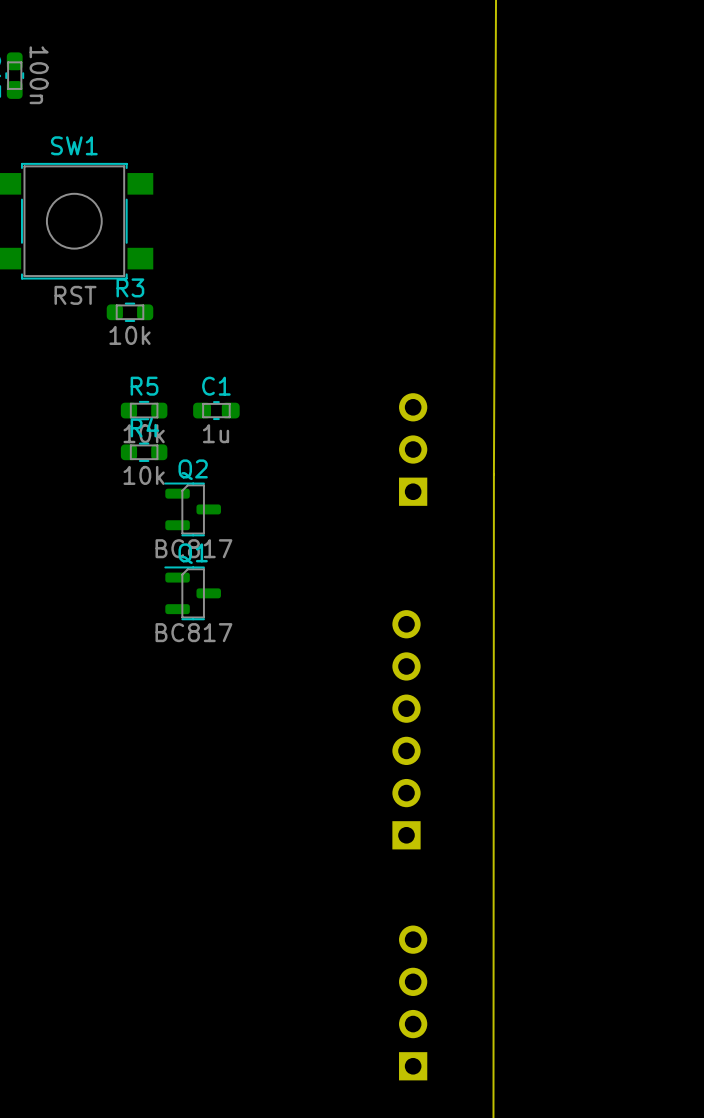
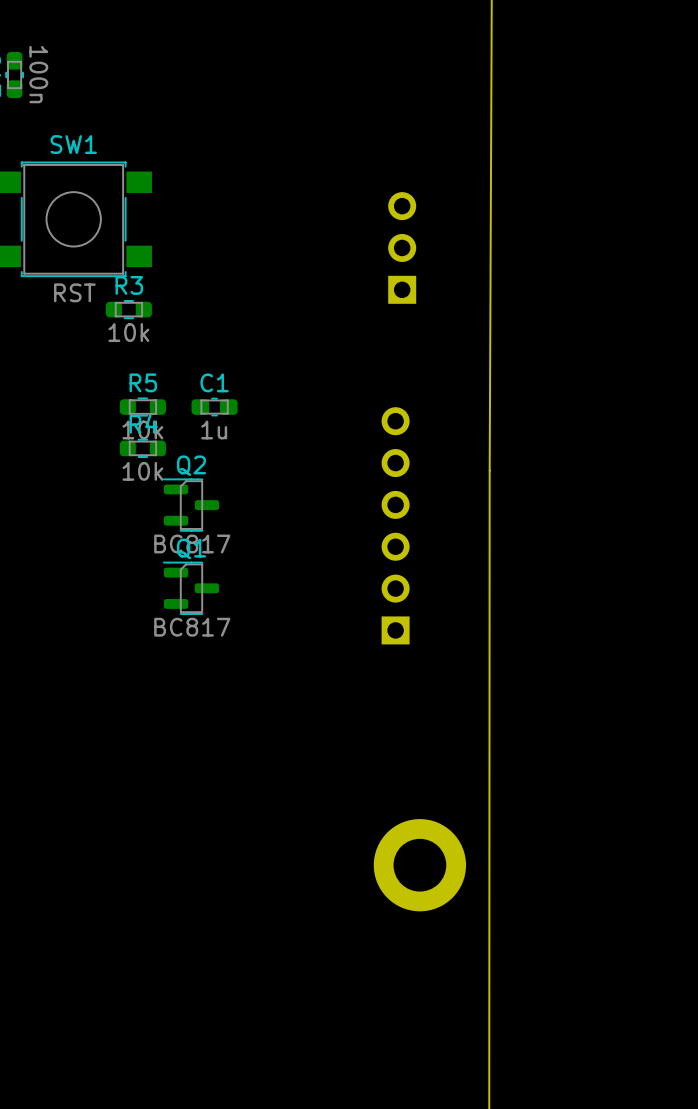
part position: (413, 449) -> (402, 247)
part position: (406, 729) -> (395, 525)
part: none -> (419, 865)
part: (413, 1002) -> none

